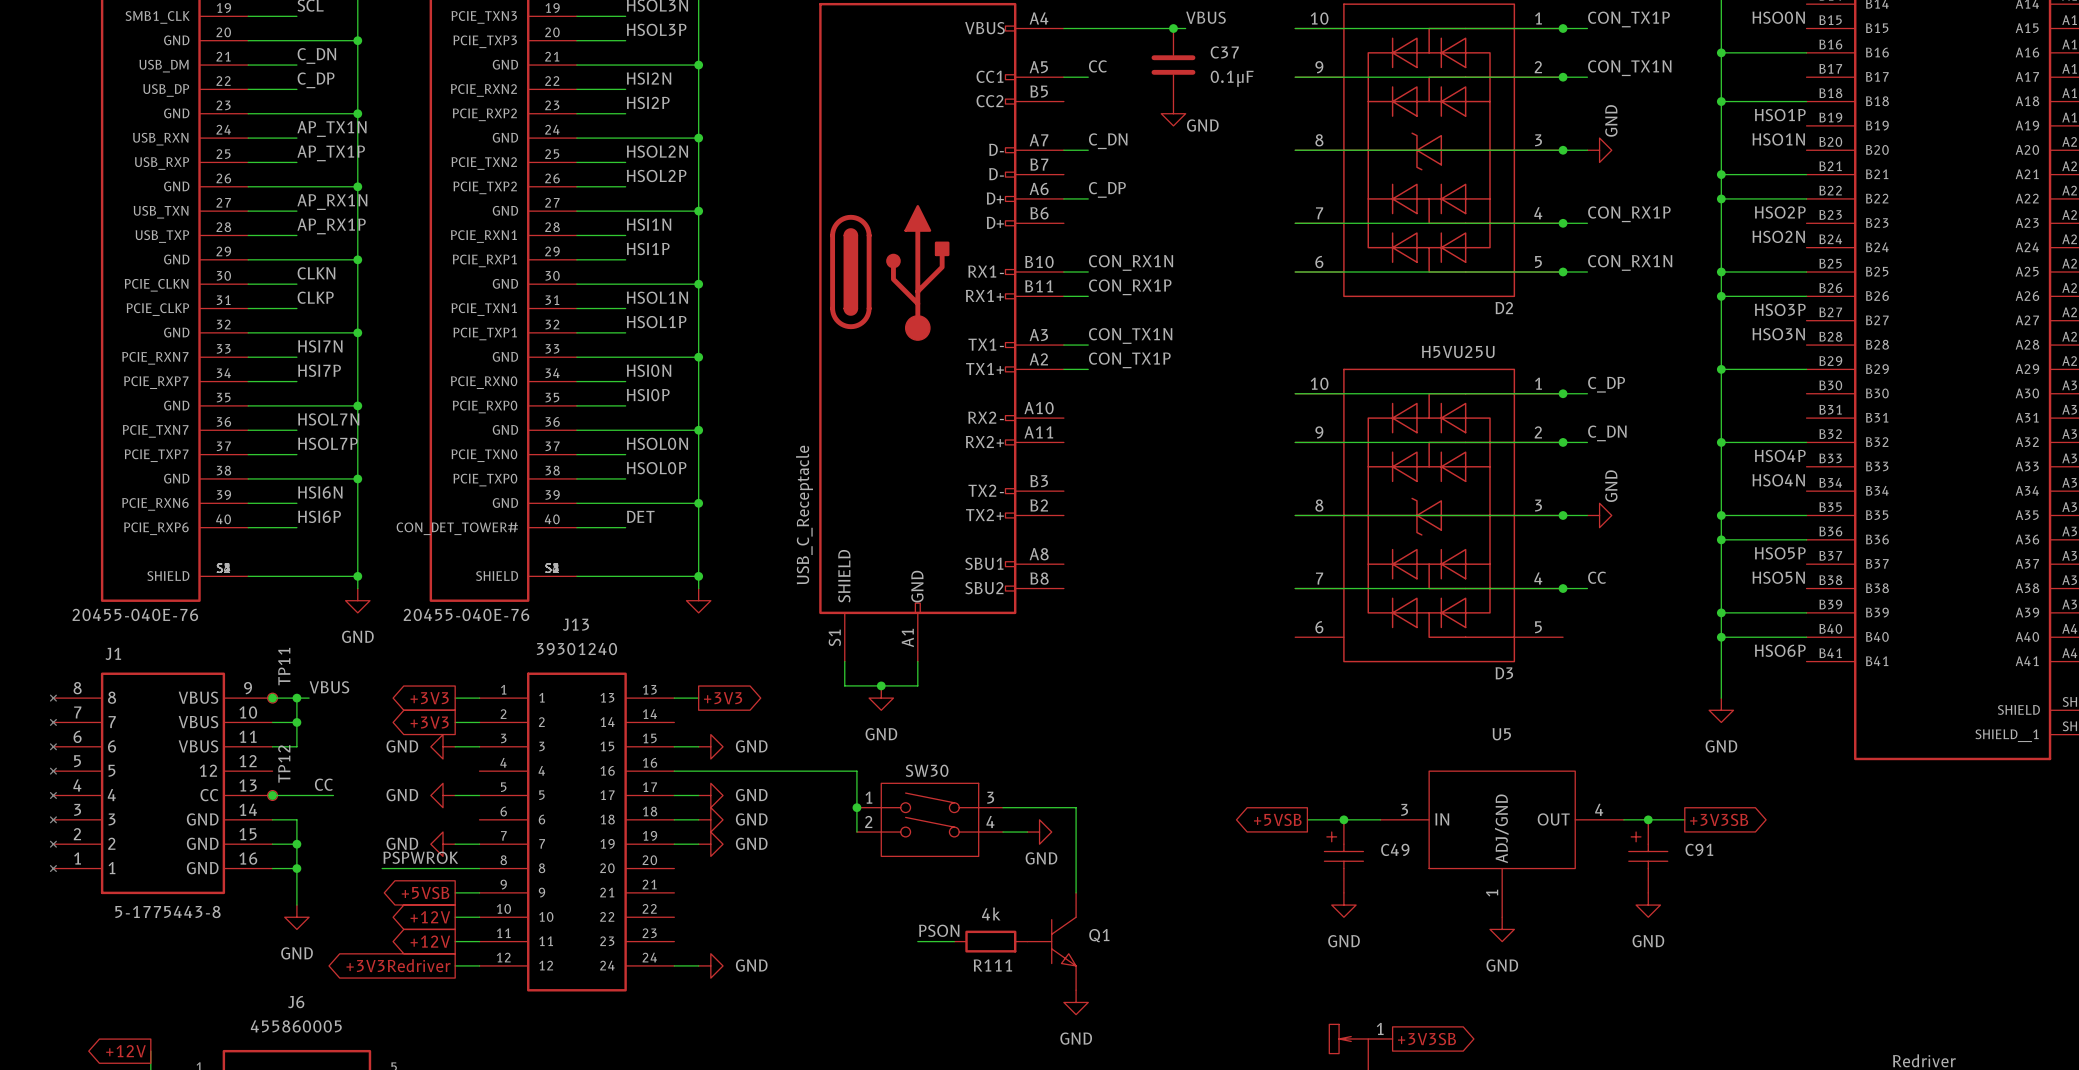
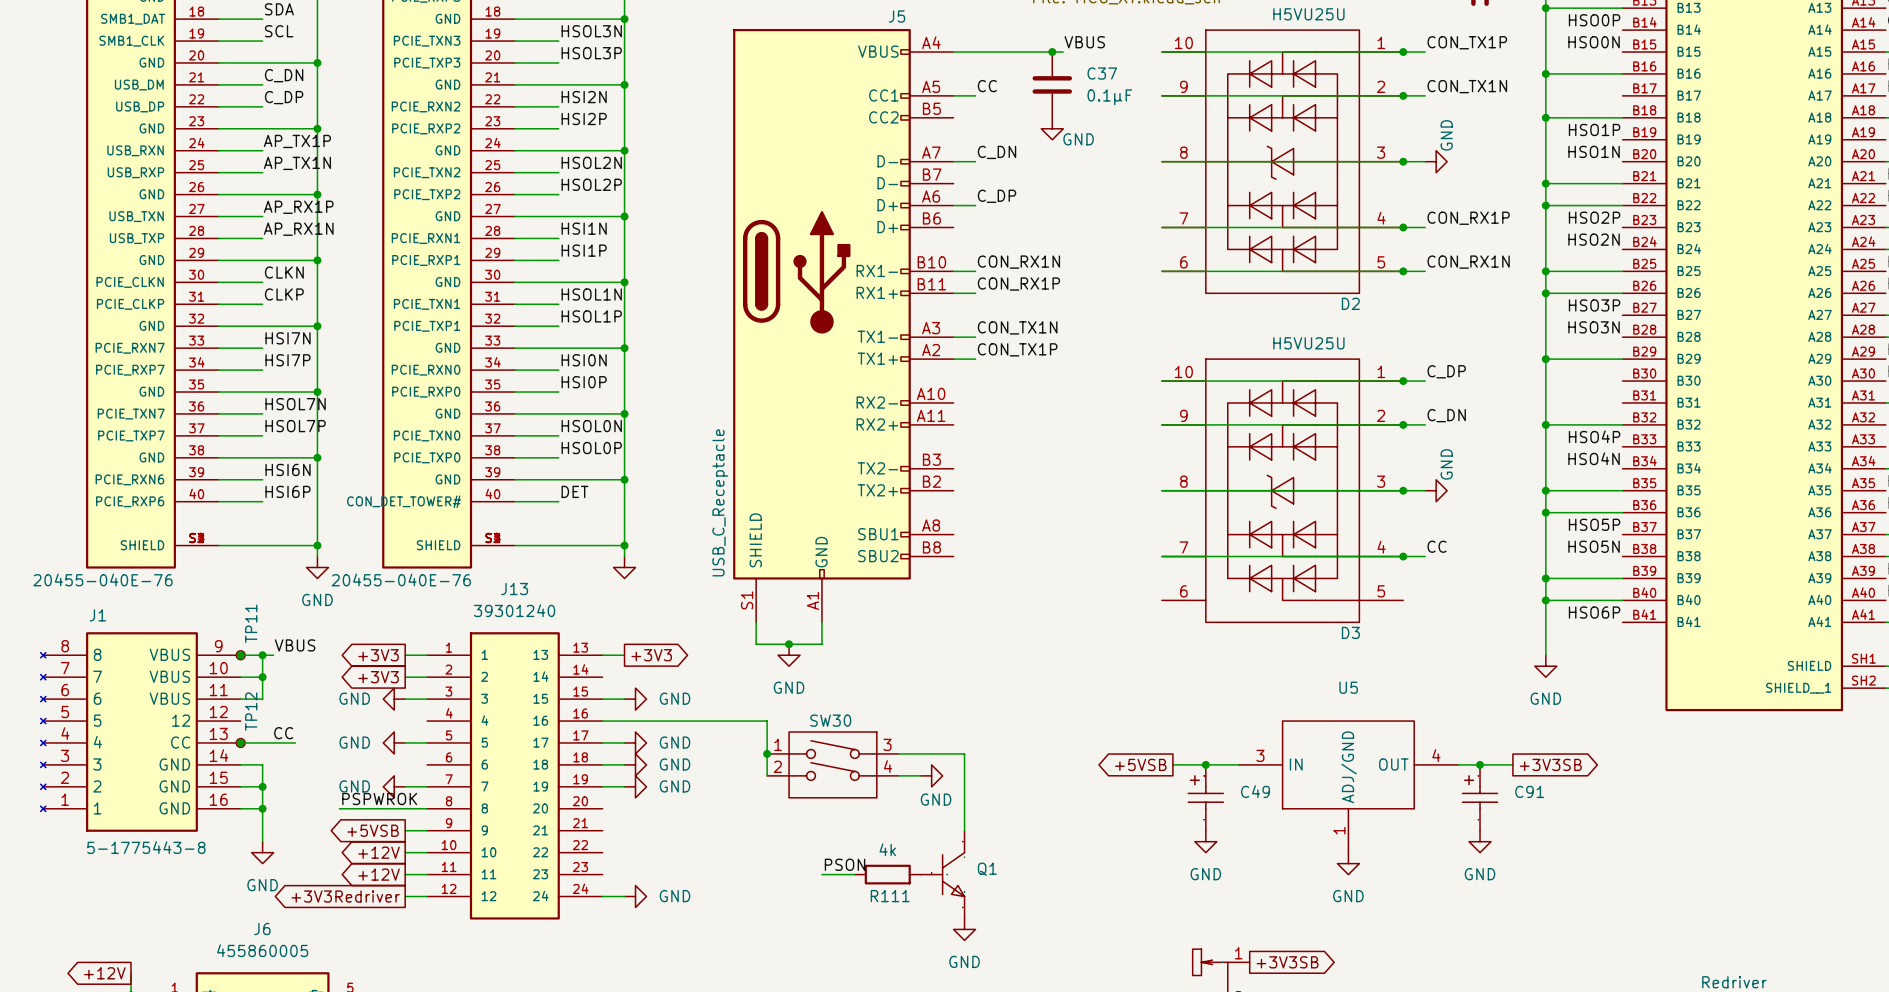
label: AP_TX1N (331, 129) -> AP_TX1P (297, 141)
label: AP_TX1P (331, 153) -> AP_TX1N (297, 163)
label: AP_RX1N (332, 202) -> AP_RX1P (298, 207)
label: AP_RX1P (331, 226) -> AP_RX1N (298, 229)

